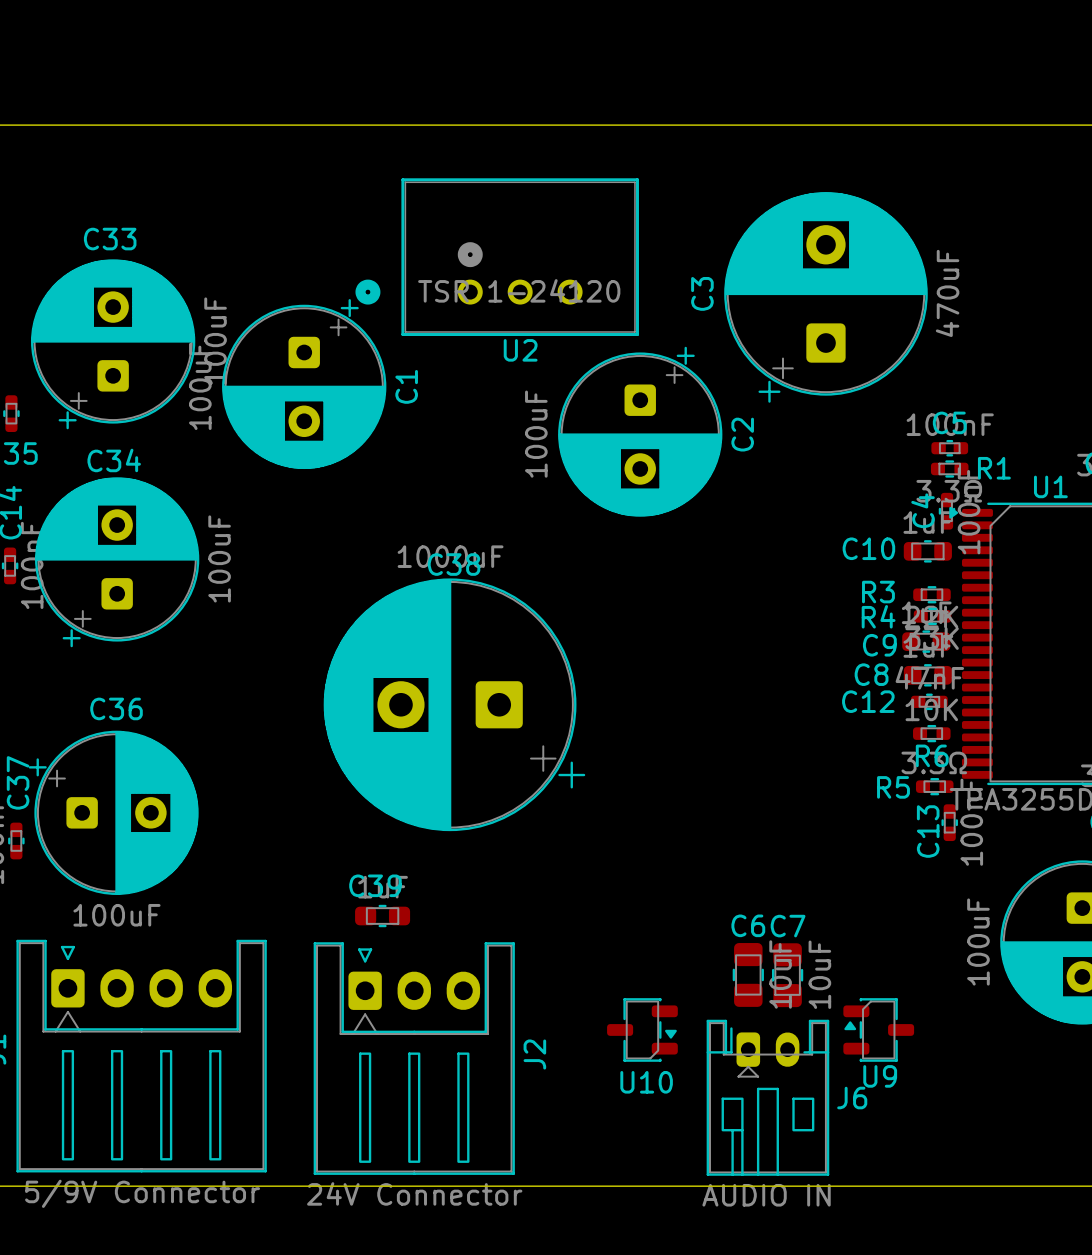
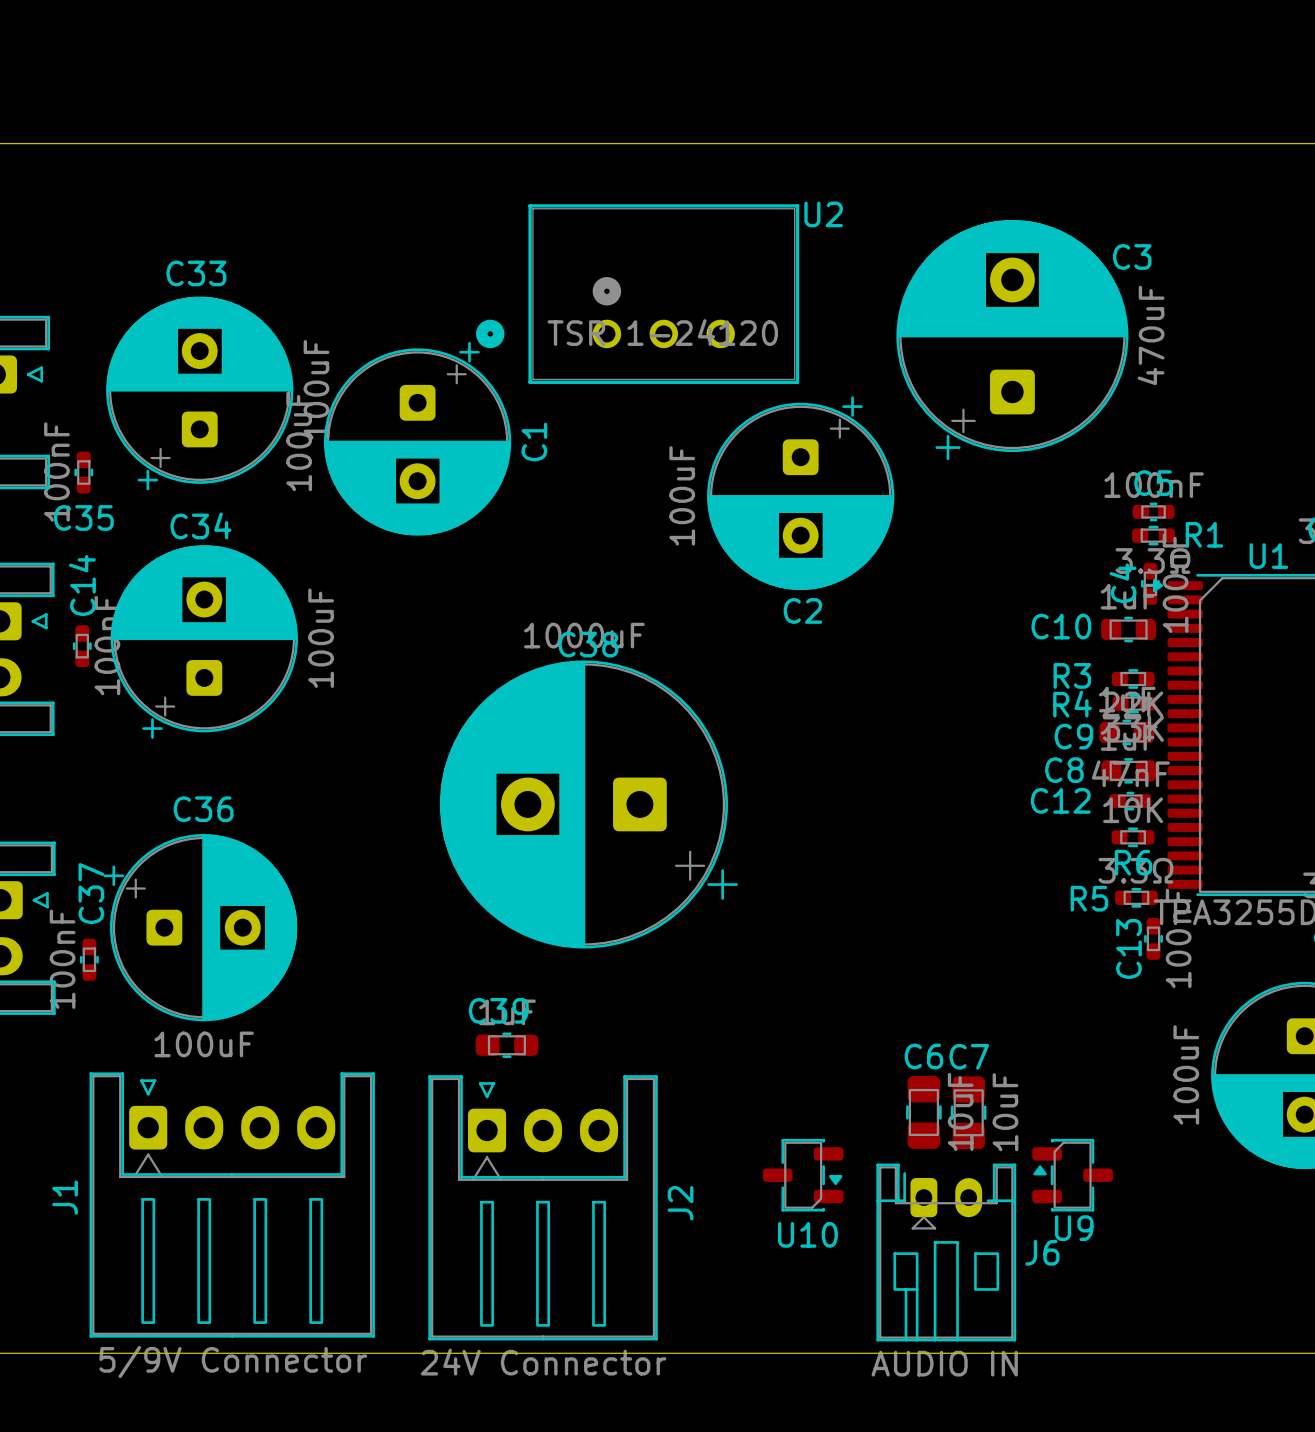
C3 name rotation: 0° (702, 293) -> 90° clockwise (1132, 256)
C3 name position: C3 (702, 293) -> C3 (1132, 256)
U2 name position: U2 (520, 350) -> U2 (823, 214)
C2 name rotation: 0° (742, 434) -> 90° clockwise (802, 610)
C2 name position: C2 (742, 434) -> C2 (802, 610)

